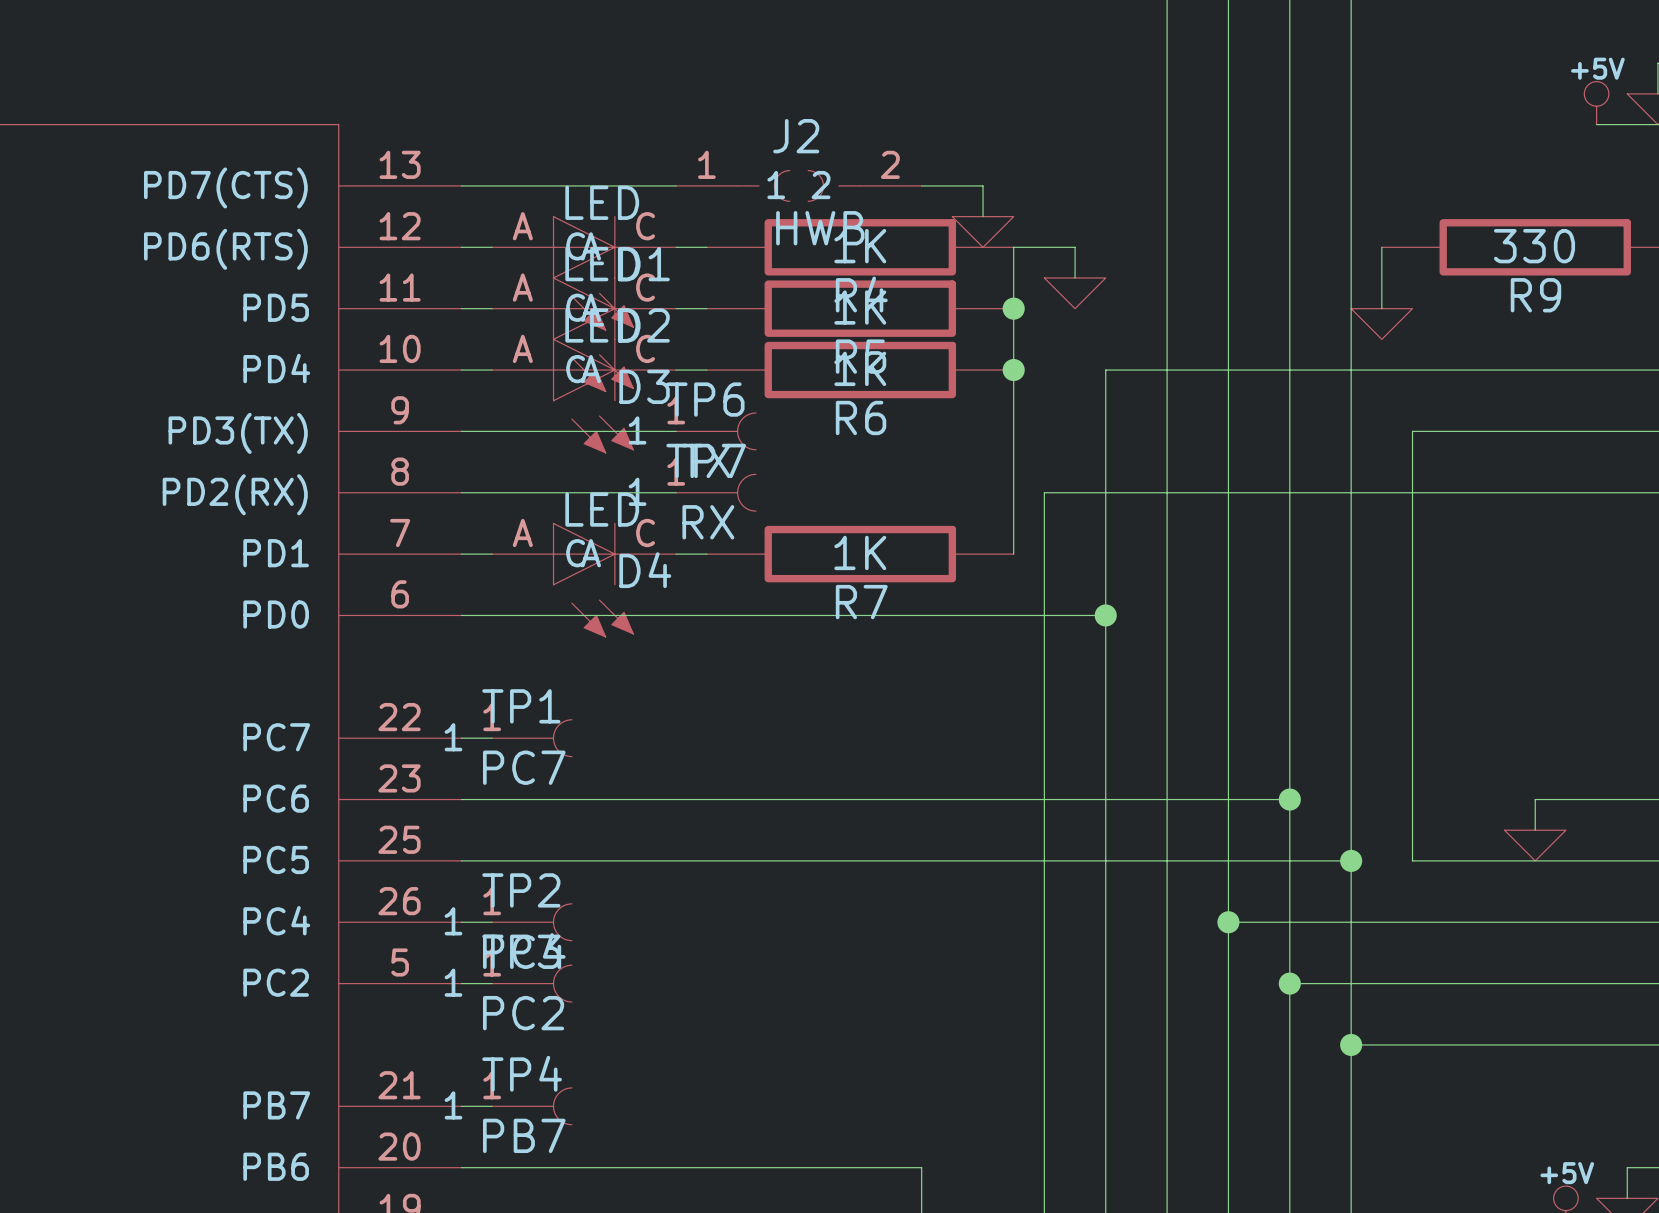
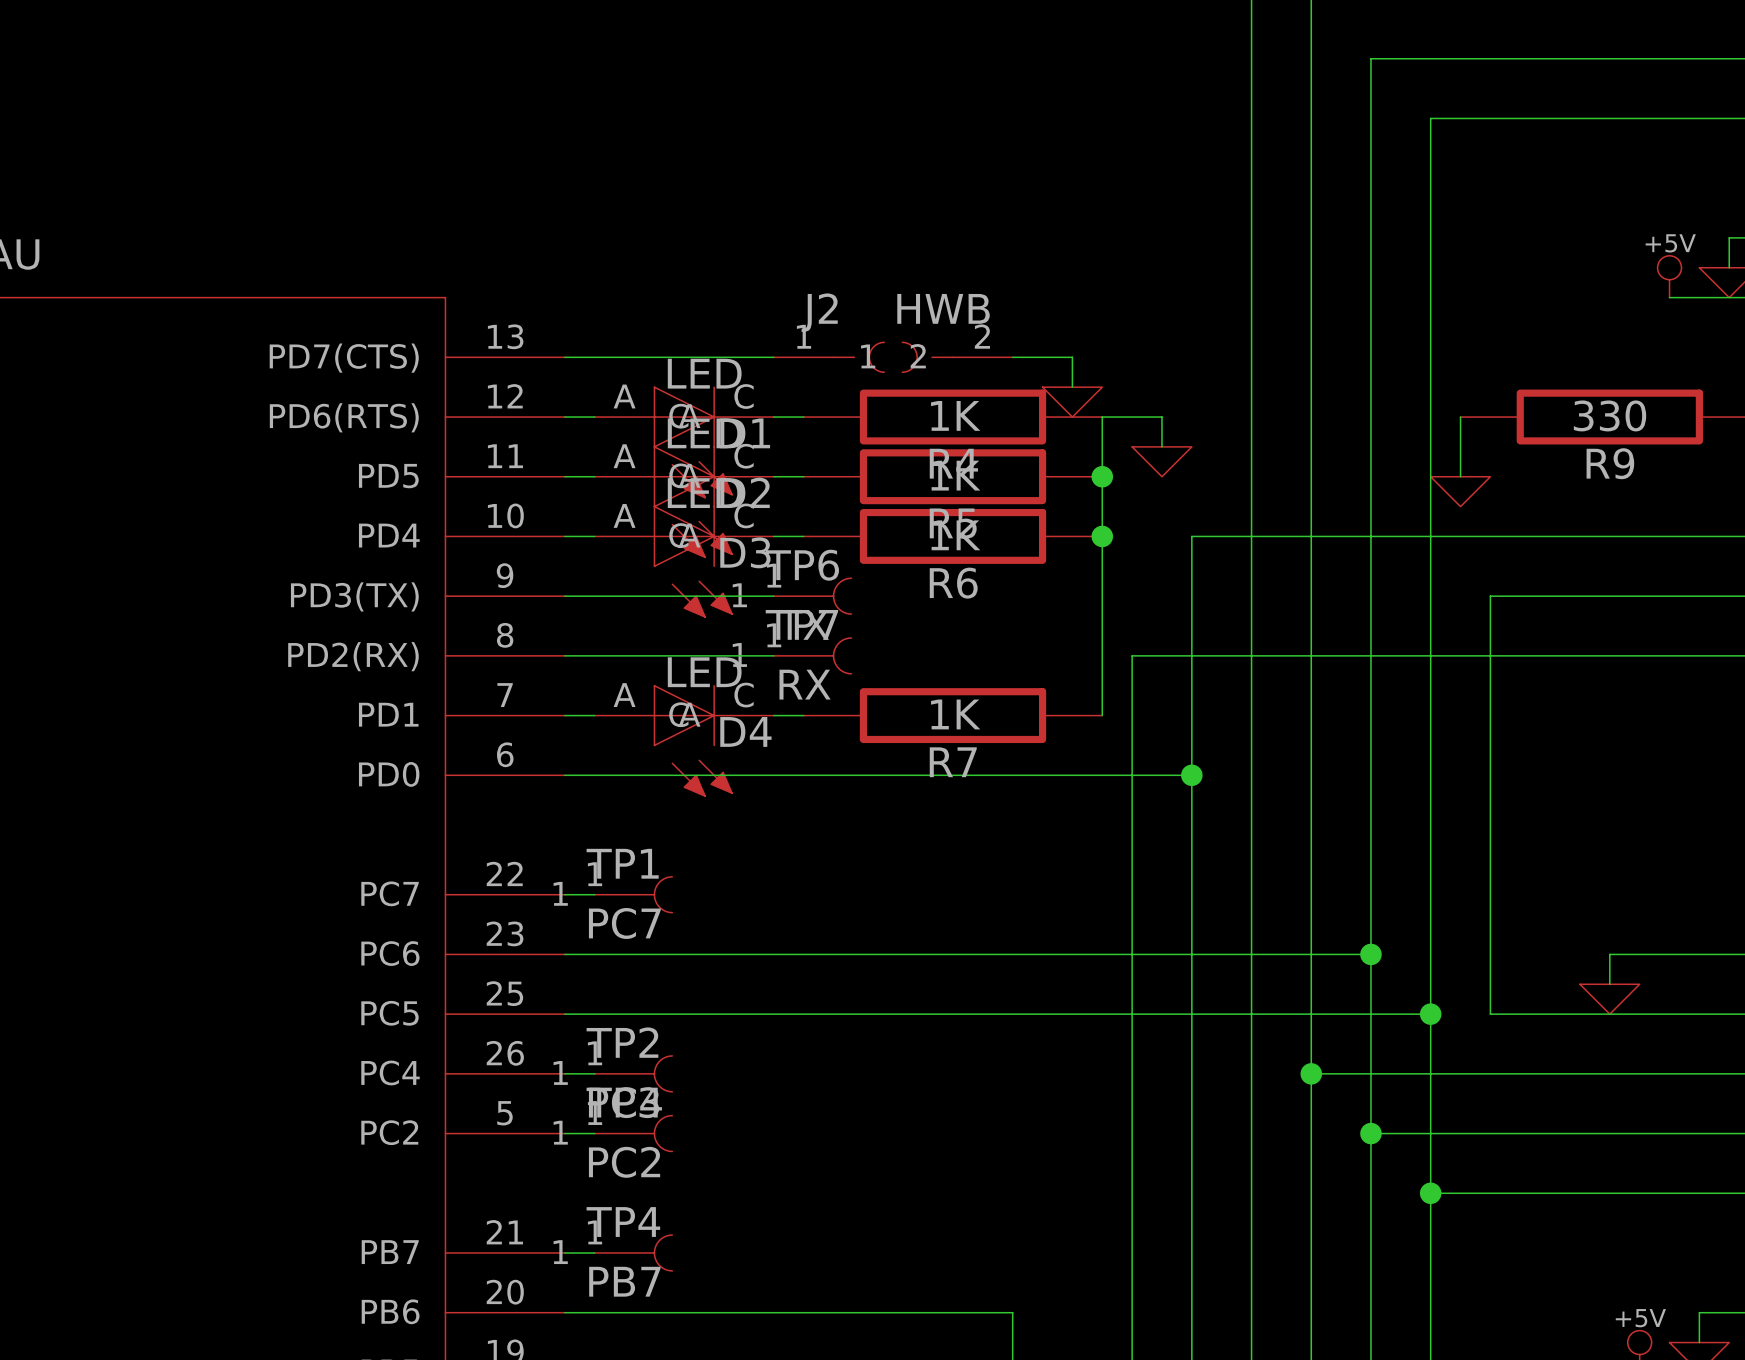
J2 name position: J2 (796, 136) -> J2 (819, 312)
J2 value position: HWB (820, 228) -> HWB (943, 308)

